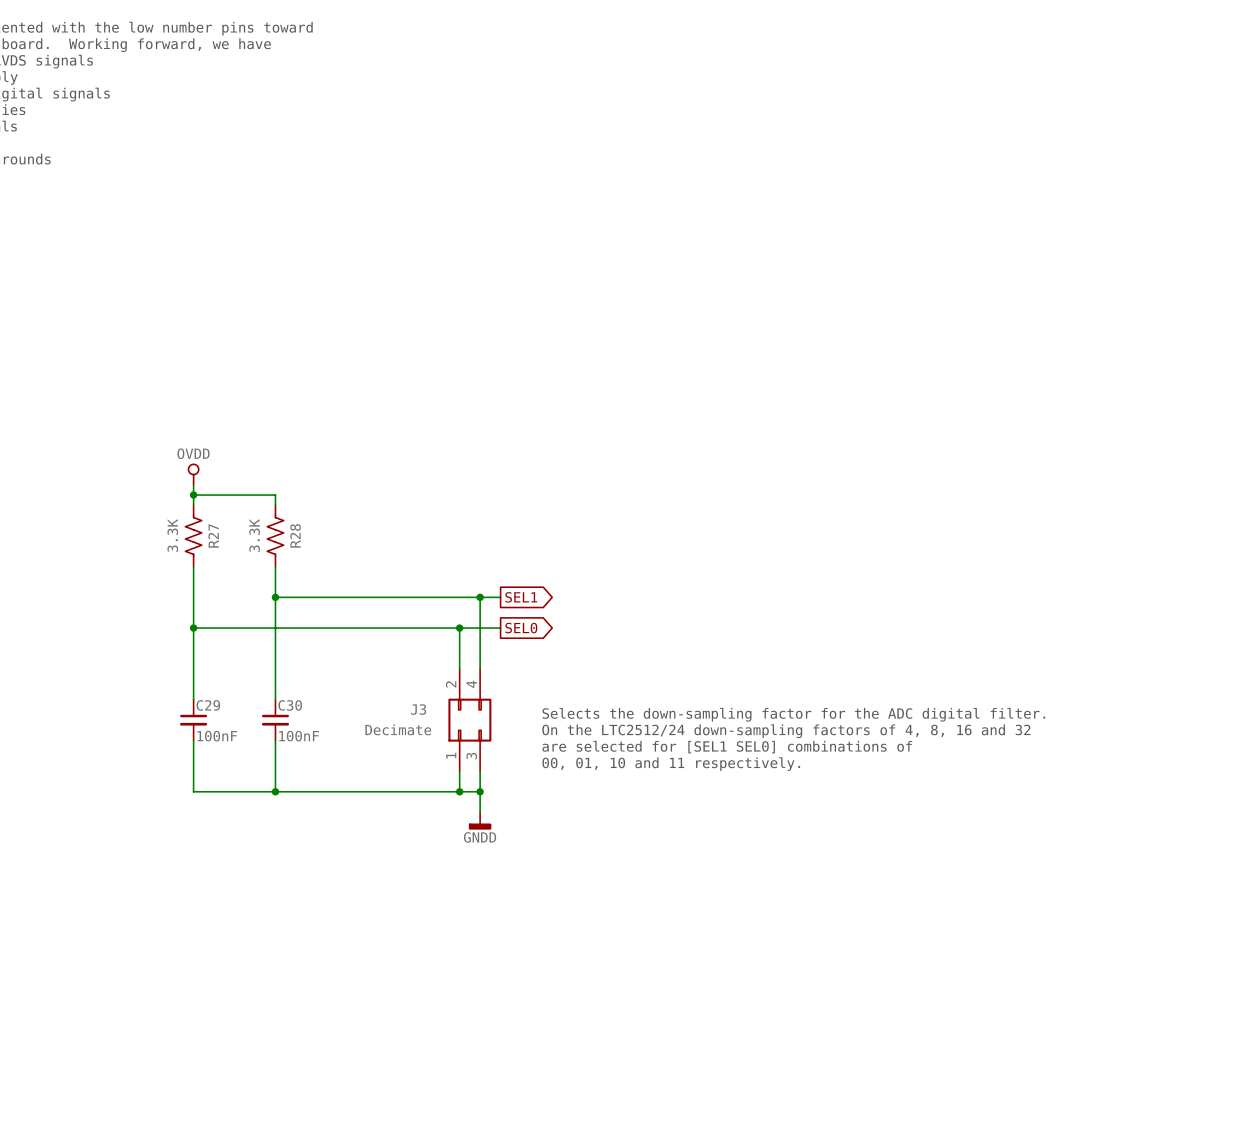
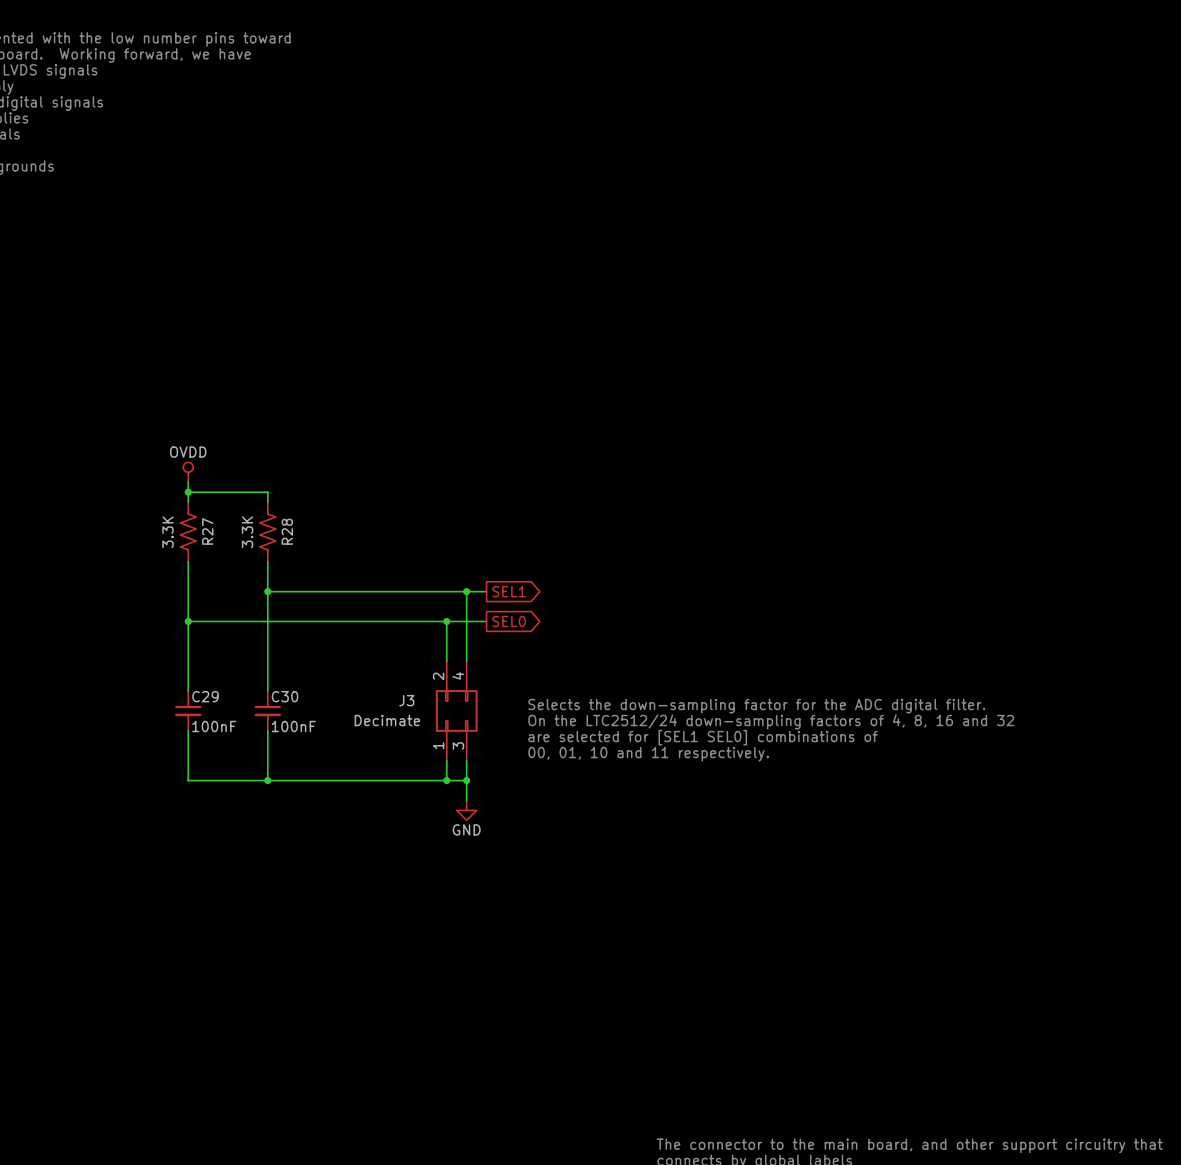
power symbol: GNDD (480, 820) -> GND (466, 810)

